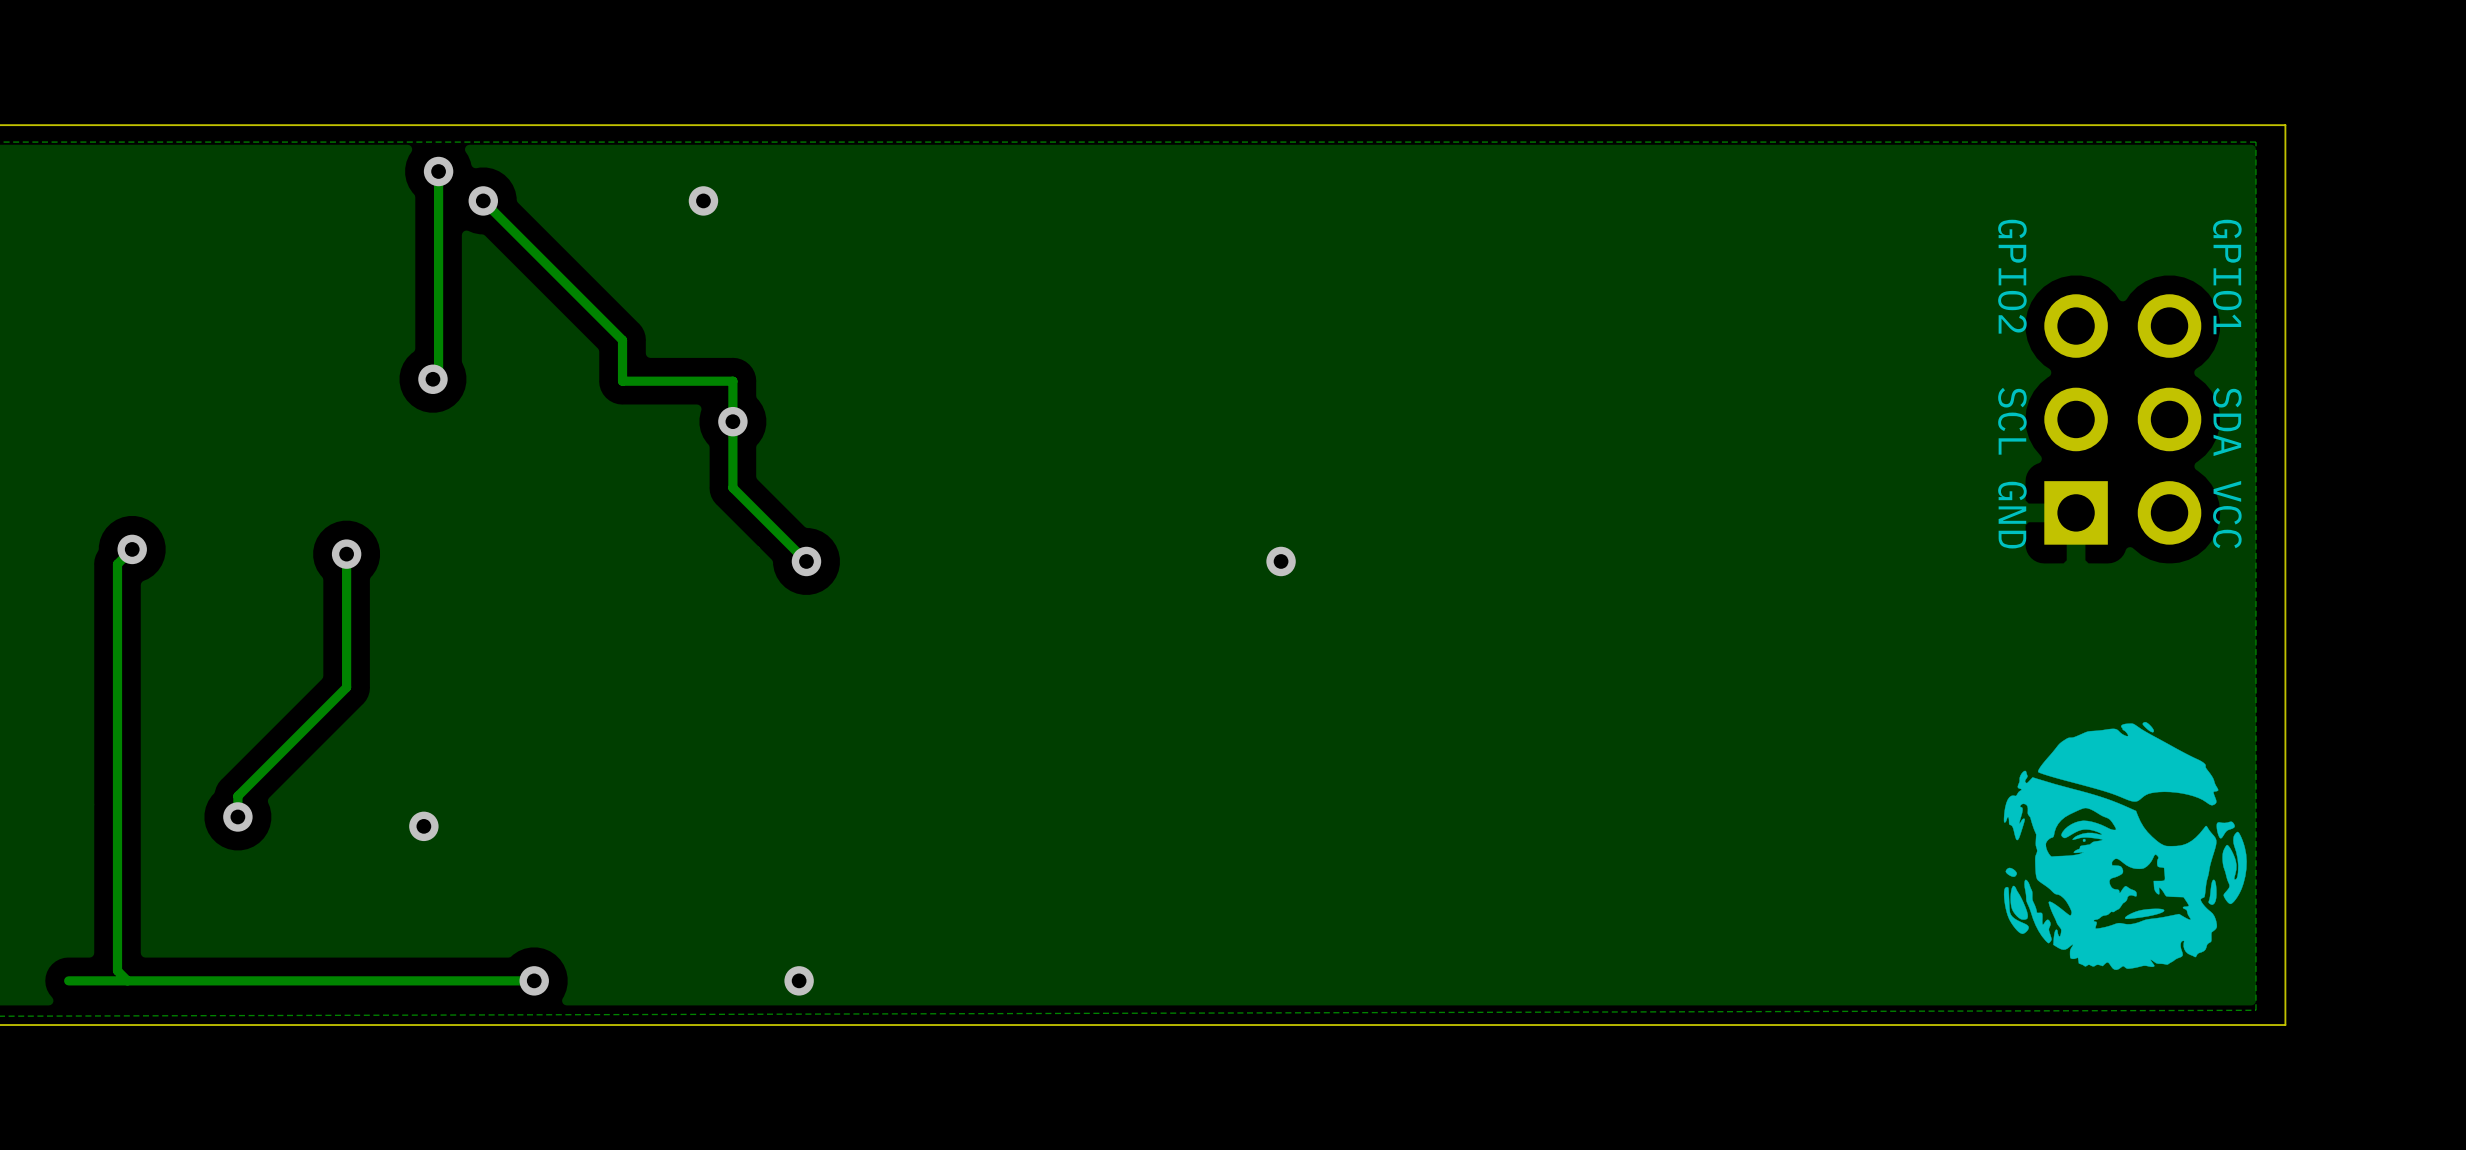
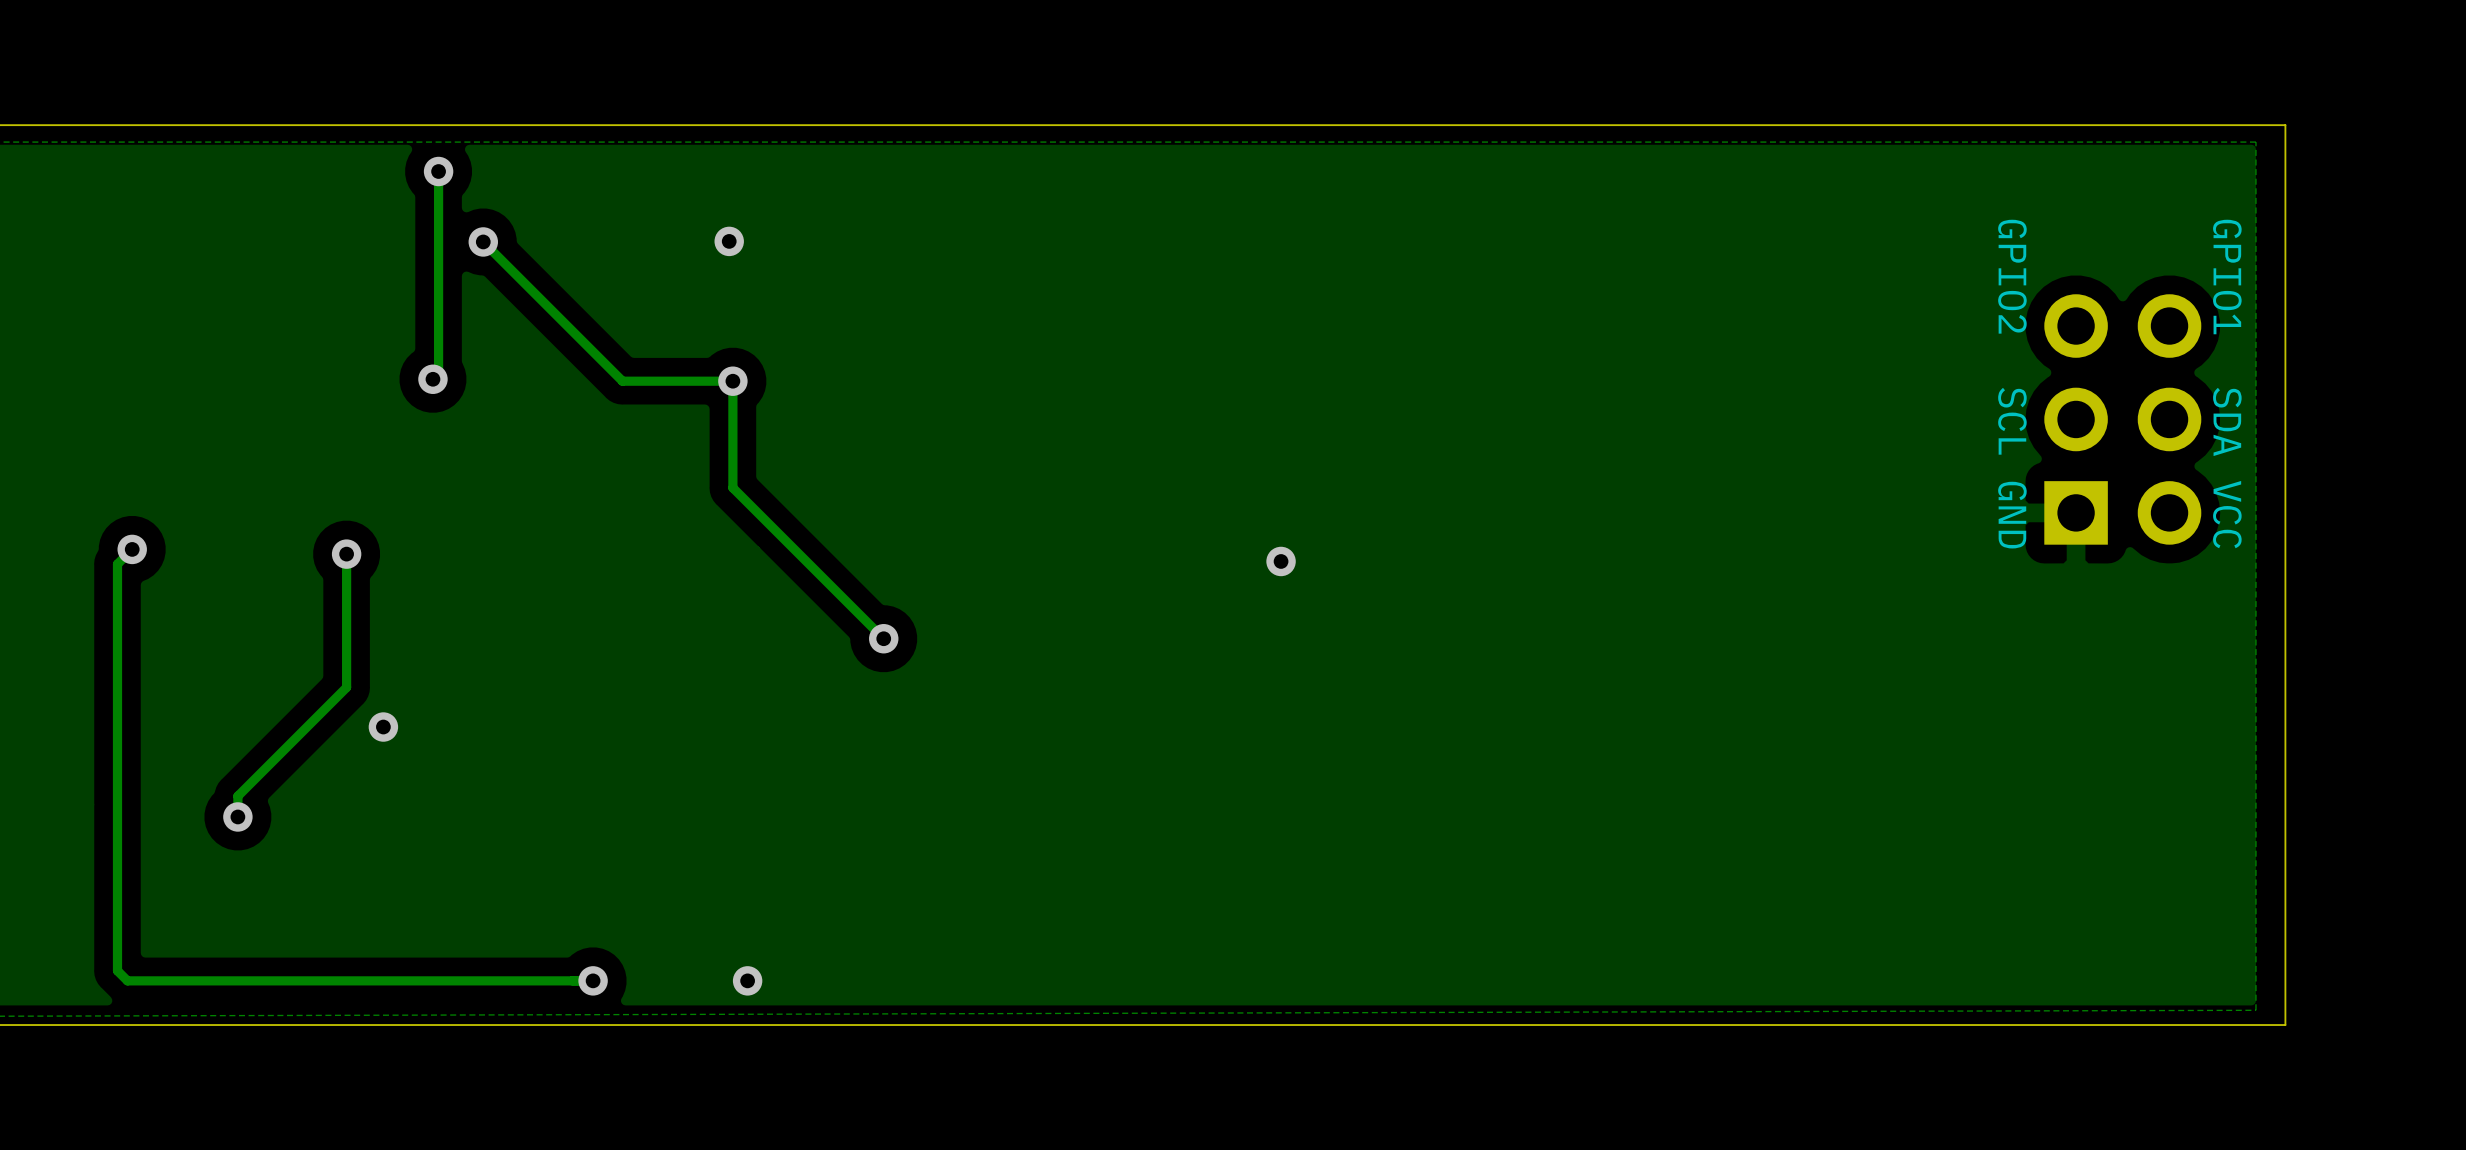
track: (483, 200) (622, 340) (622, 381) -> (483, 241) (622, 381)
via position: (483, 200) -> (483, 241)
via position: (703, 200) -> (729, 241)
via position: (732, 421) -> (732, 381)
track: none -> (806, 561) (883, 638)
via: (806, 561) -> none
via: none -> (883, 638)
drawing: [2003, 721, 2247, 970] -> none
via position: (423, 826) -> (383, 727)
track: (127, 980) (68, 980) -> (593, 980) (534, 980)
via position: (534, 980) -> (593, 980)
via position: (799, 980) -> (747, 980)

